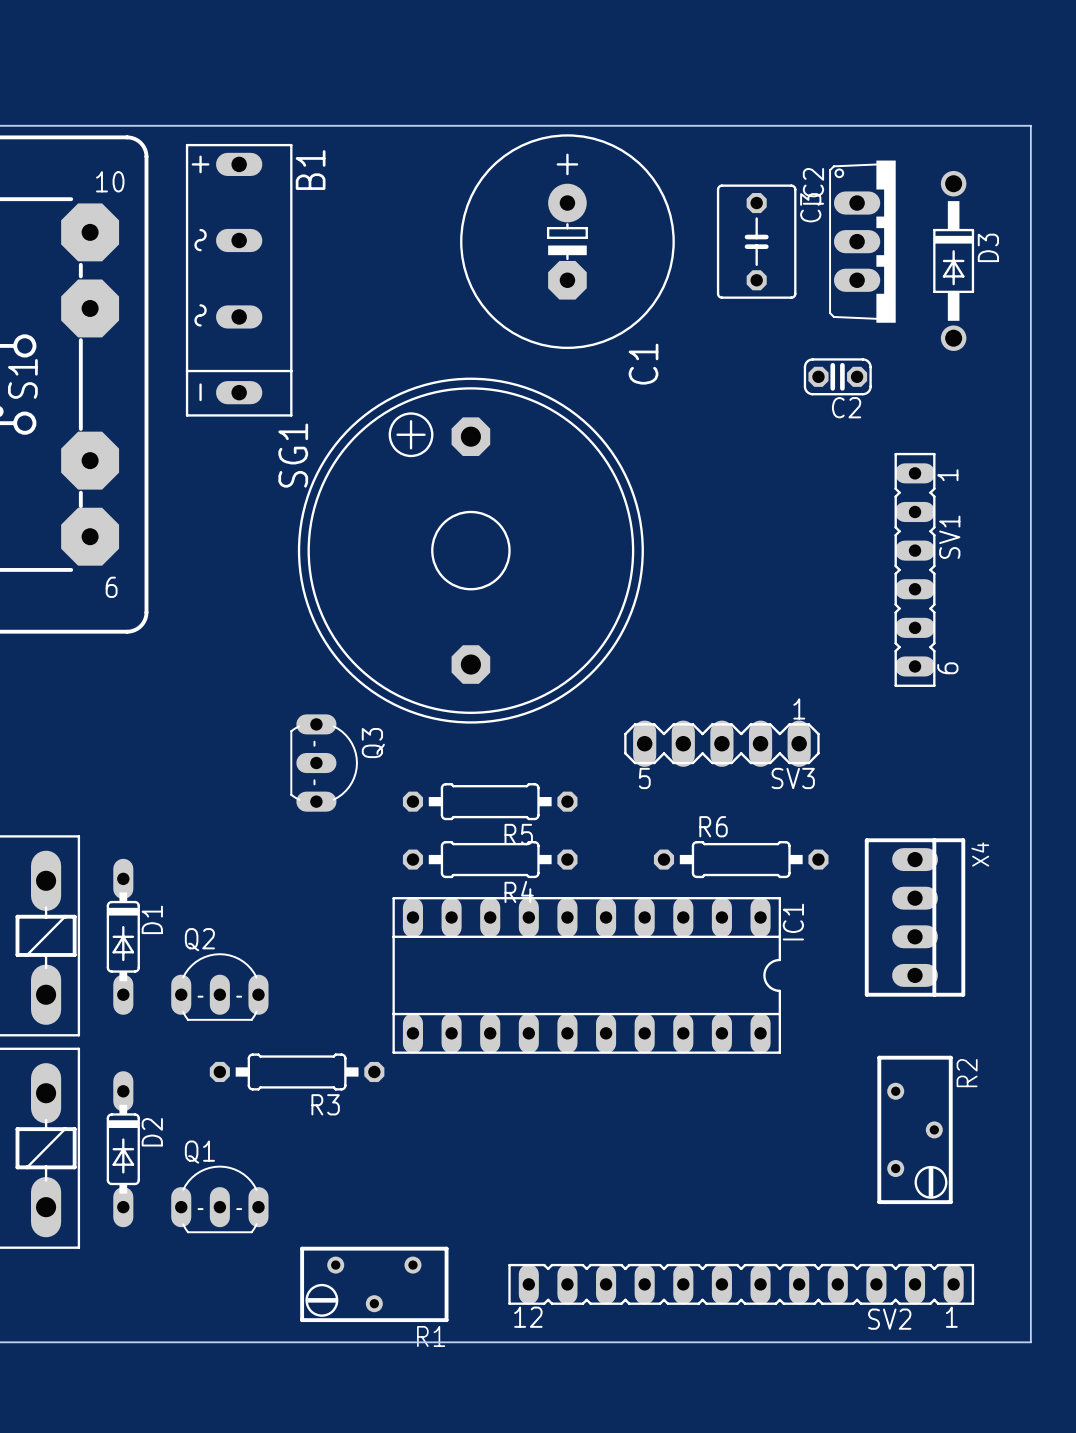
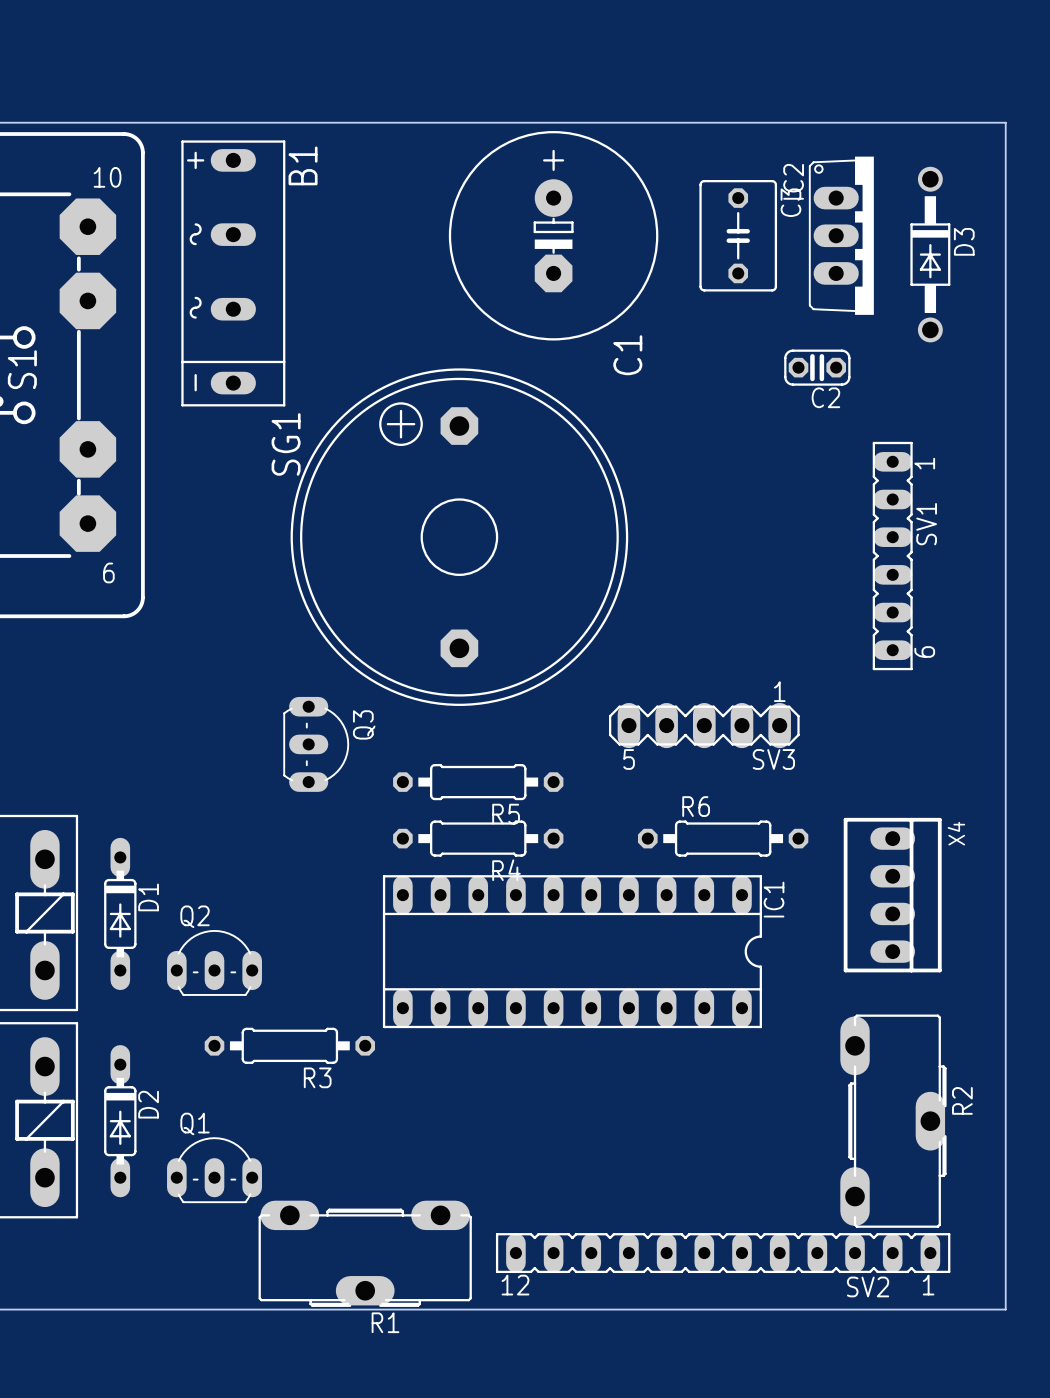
R2 footprint: [877, 1055, 953, 1205] -> [840, 1014, 947, 1228]
R2 name position: R2 (967, 1073) -> R2 (962, 1100)
R1 footprint: [300, 1246, 449, 1323] -> [258, 1200, 472, 1307]
R1 name position: R1 (431, 1336) -> R1 (385, 1322)

